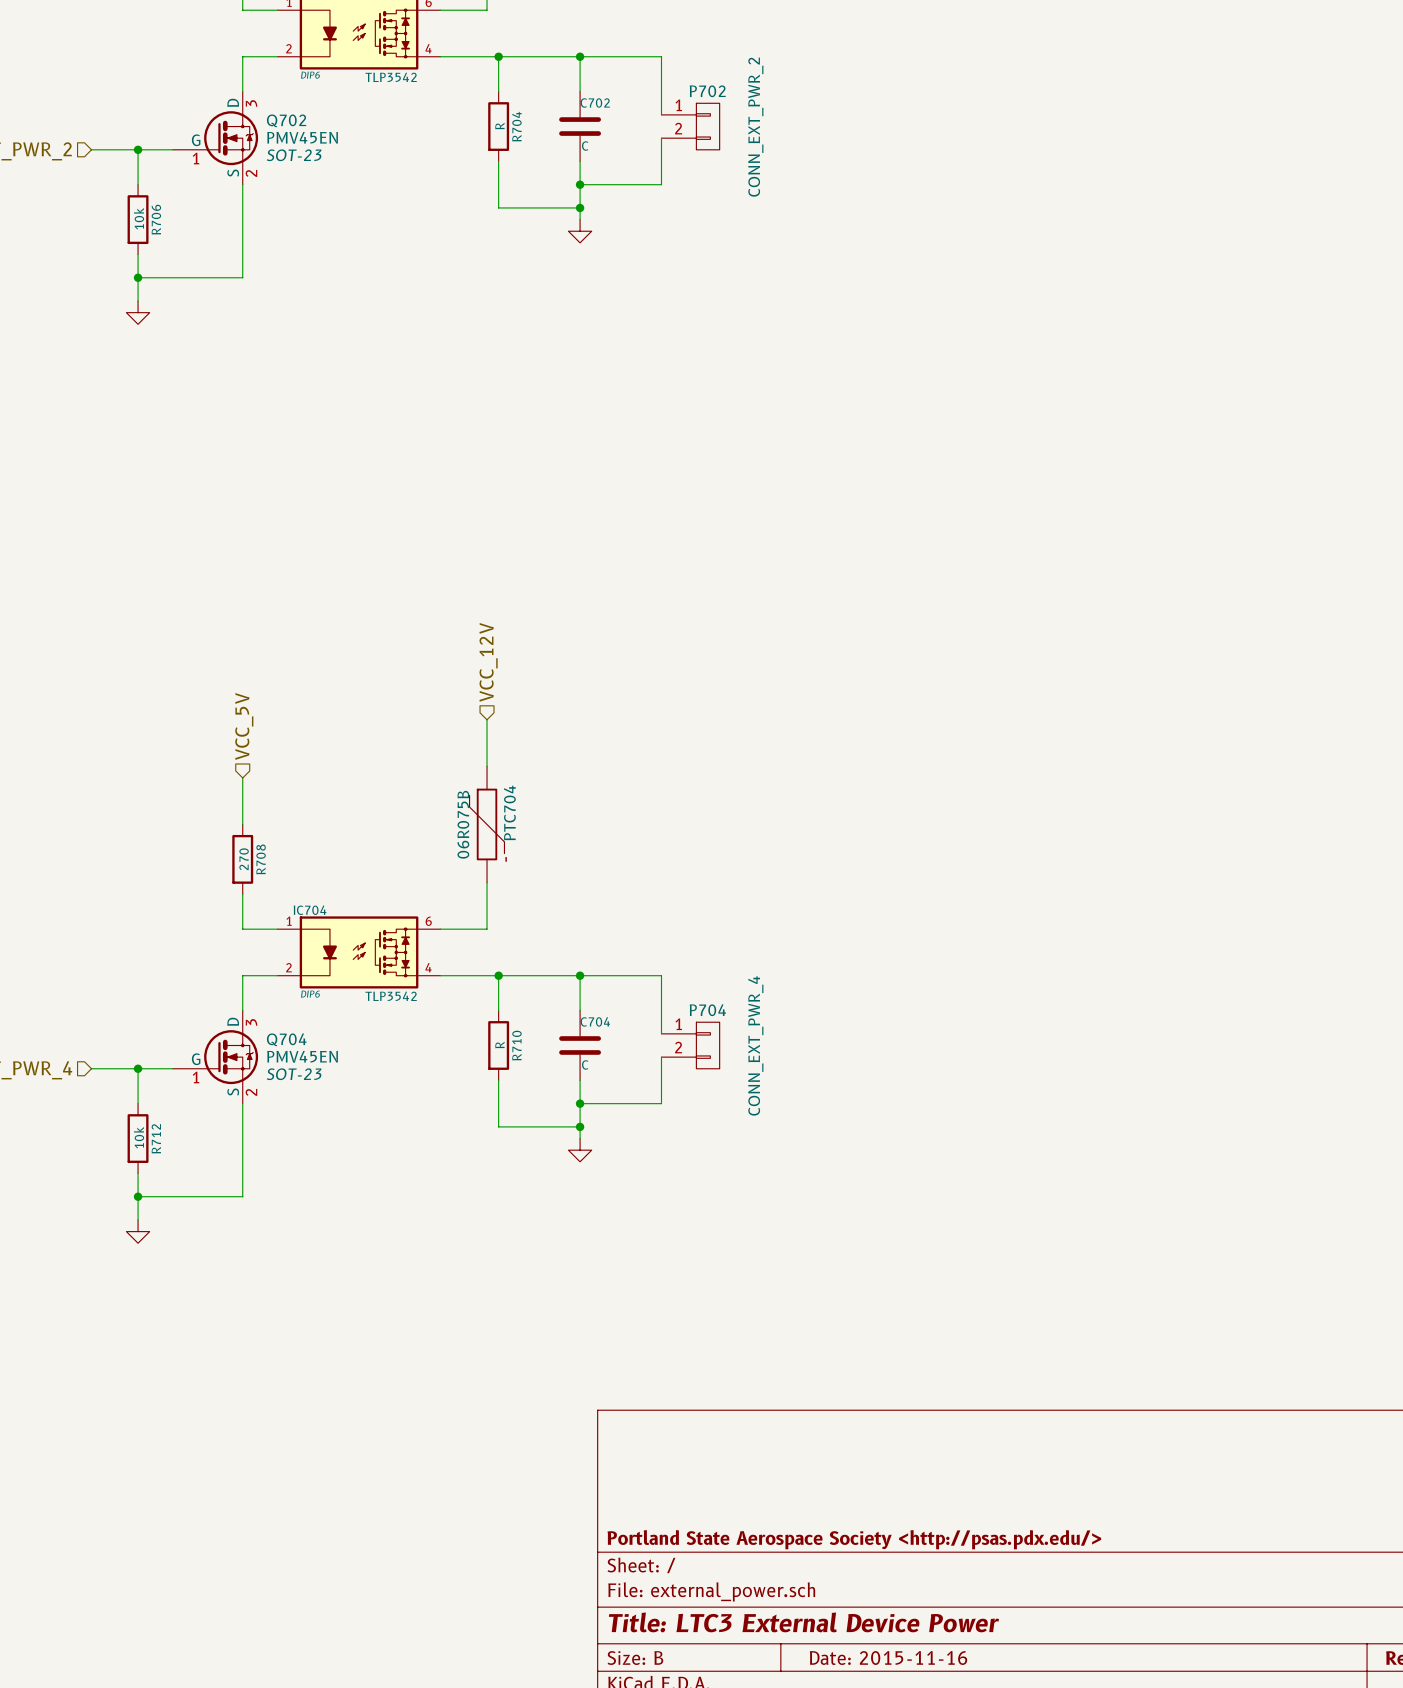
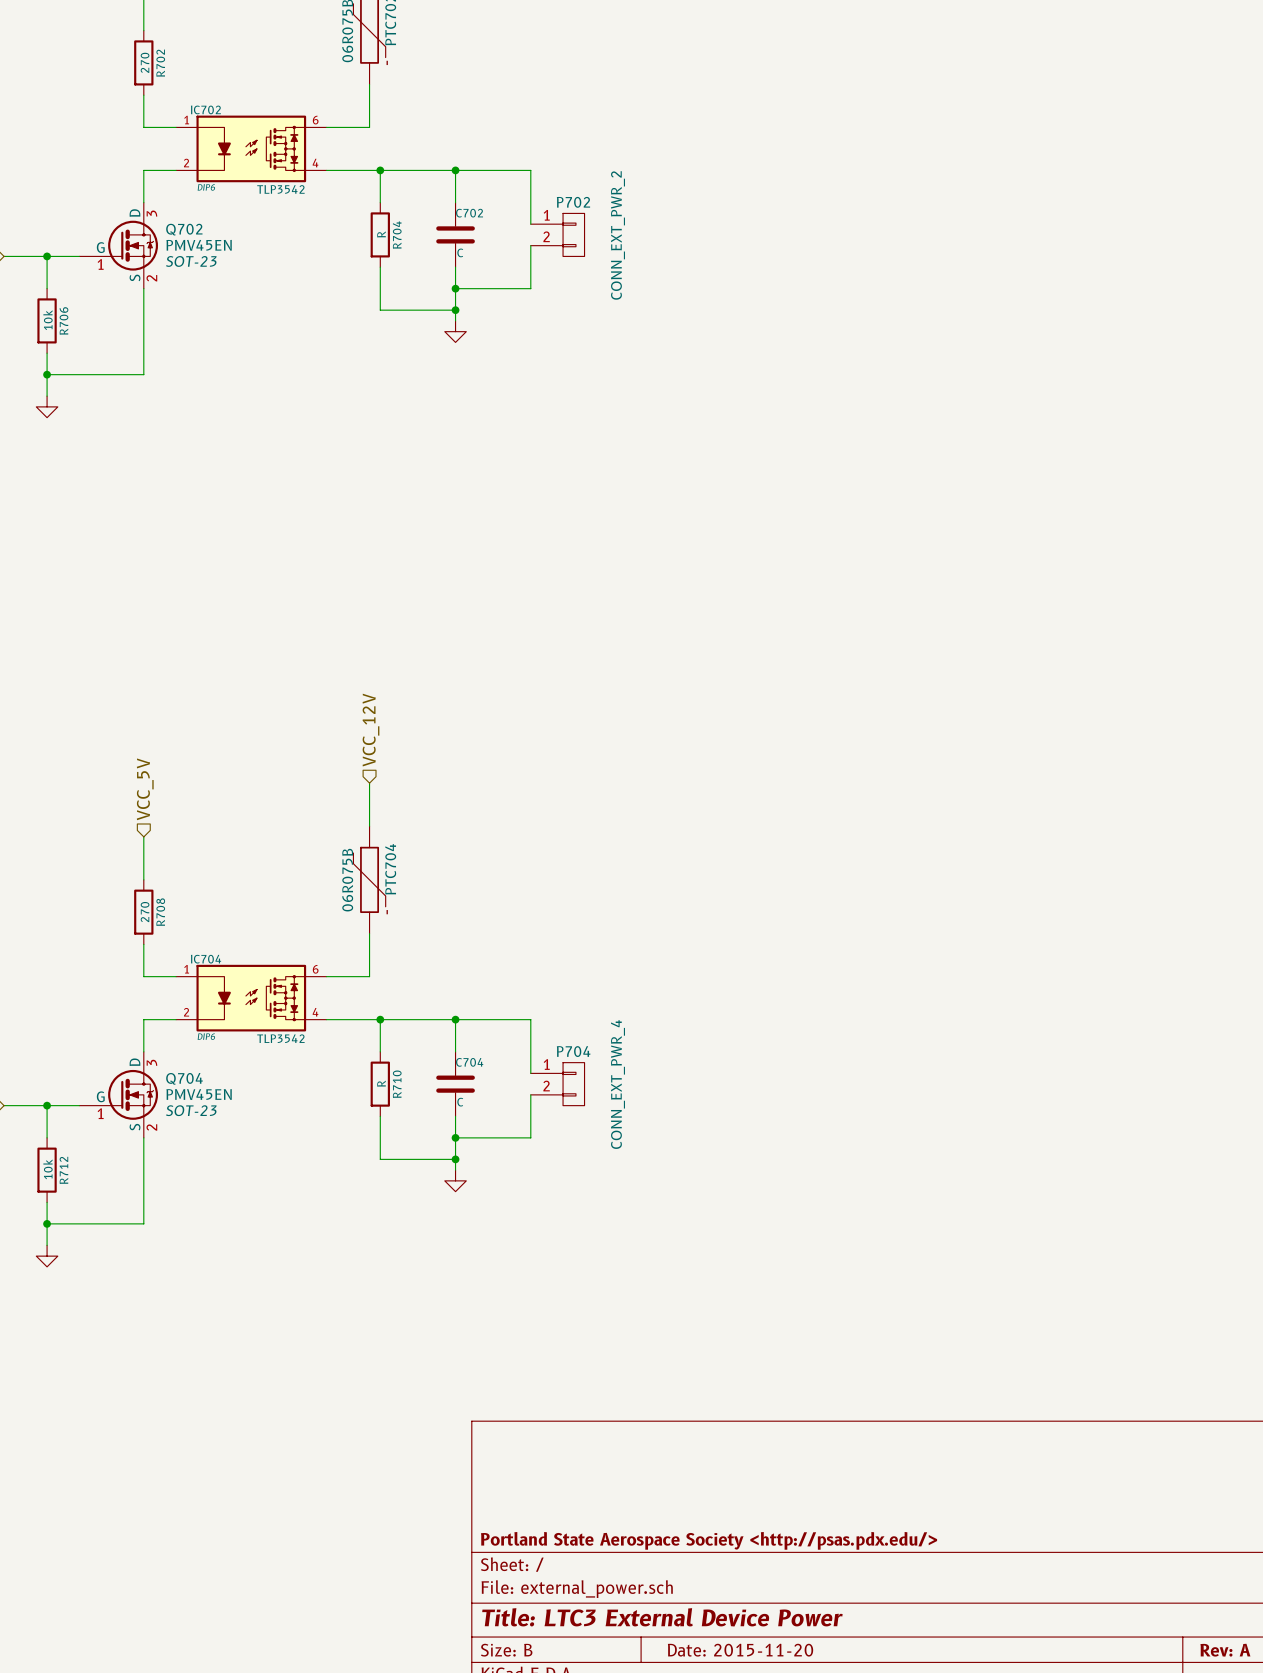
title block: Date: 2015-11-16 (888, 1658) -> Date: 2015-11-20 (740, 1650)

